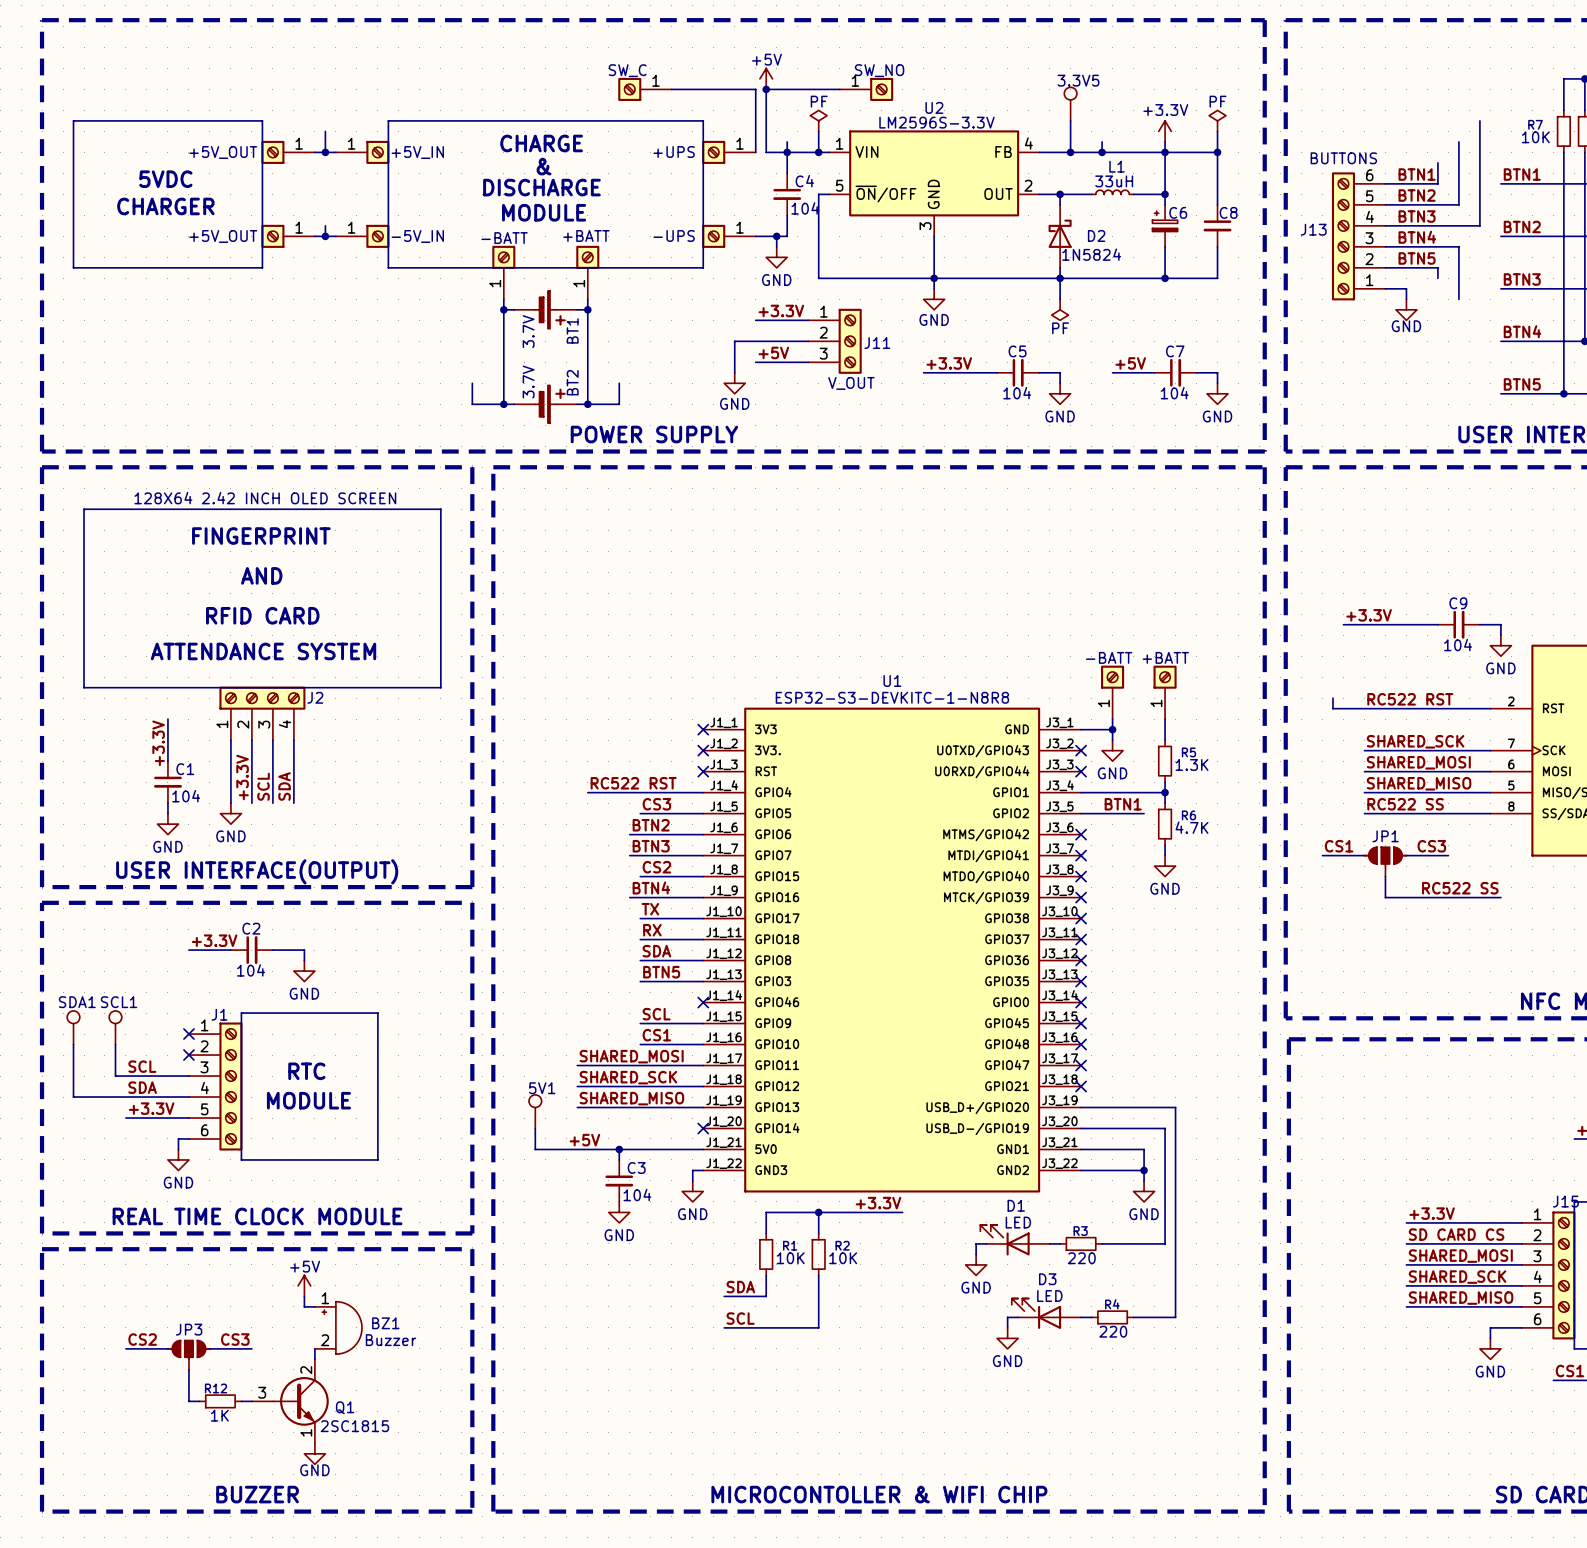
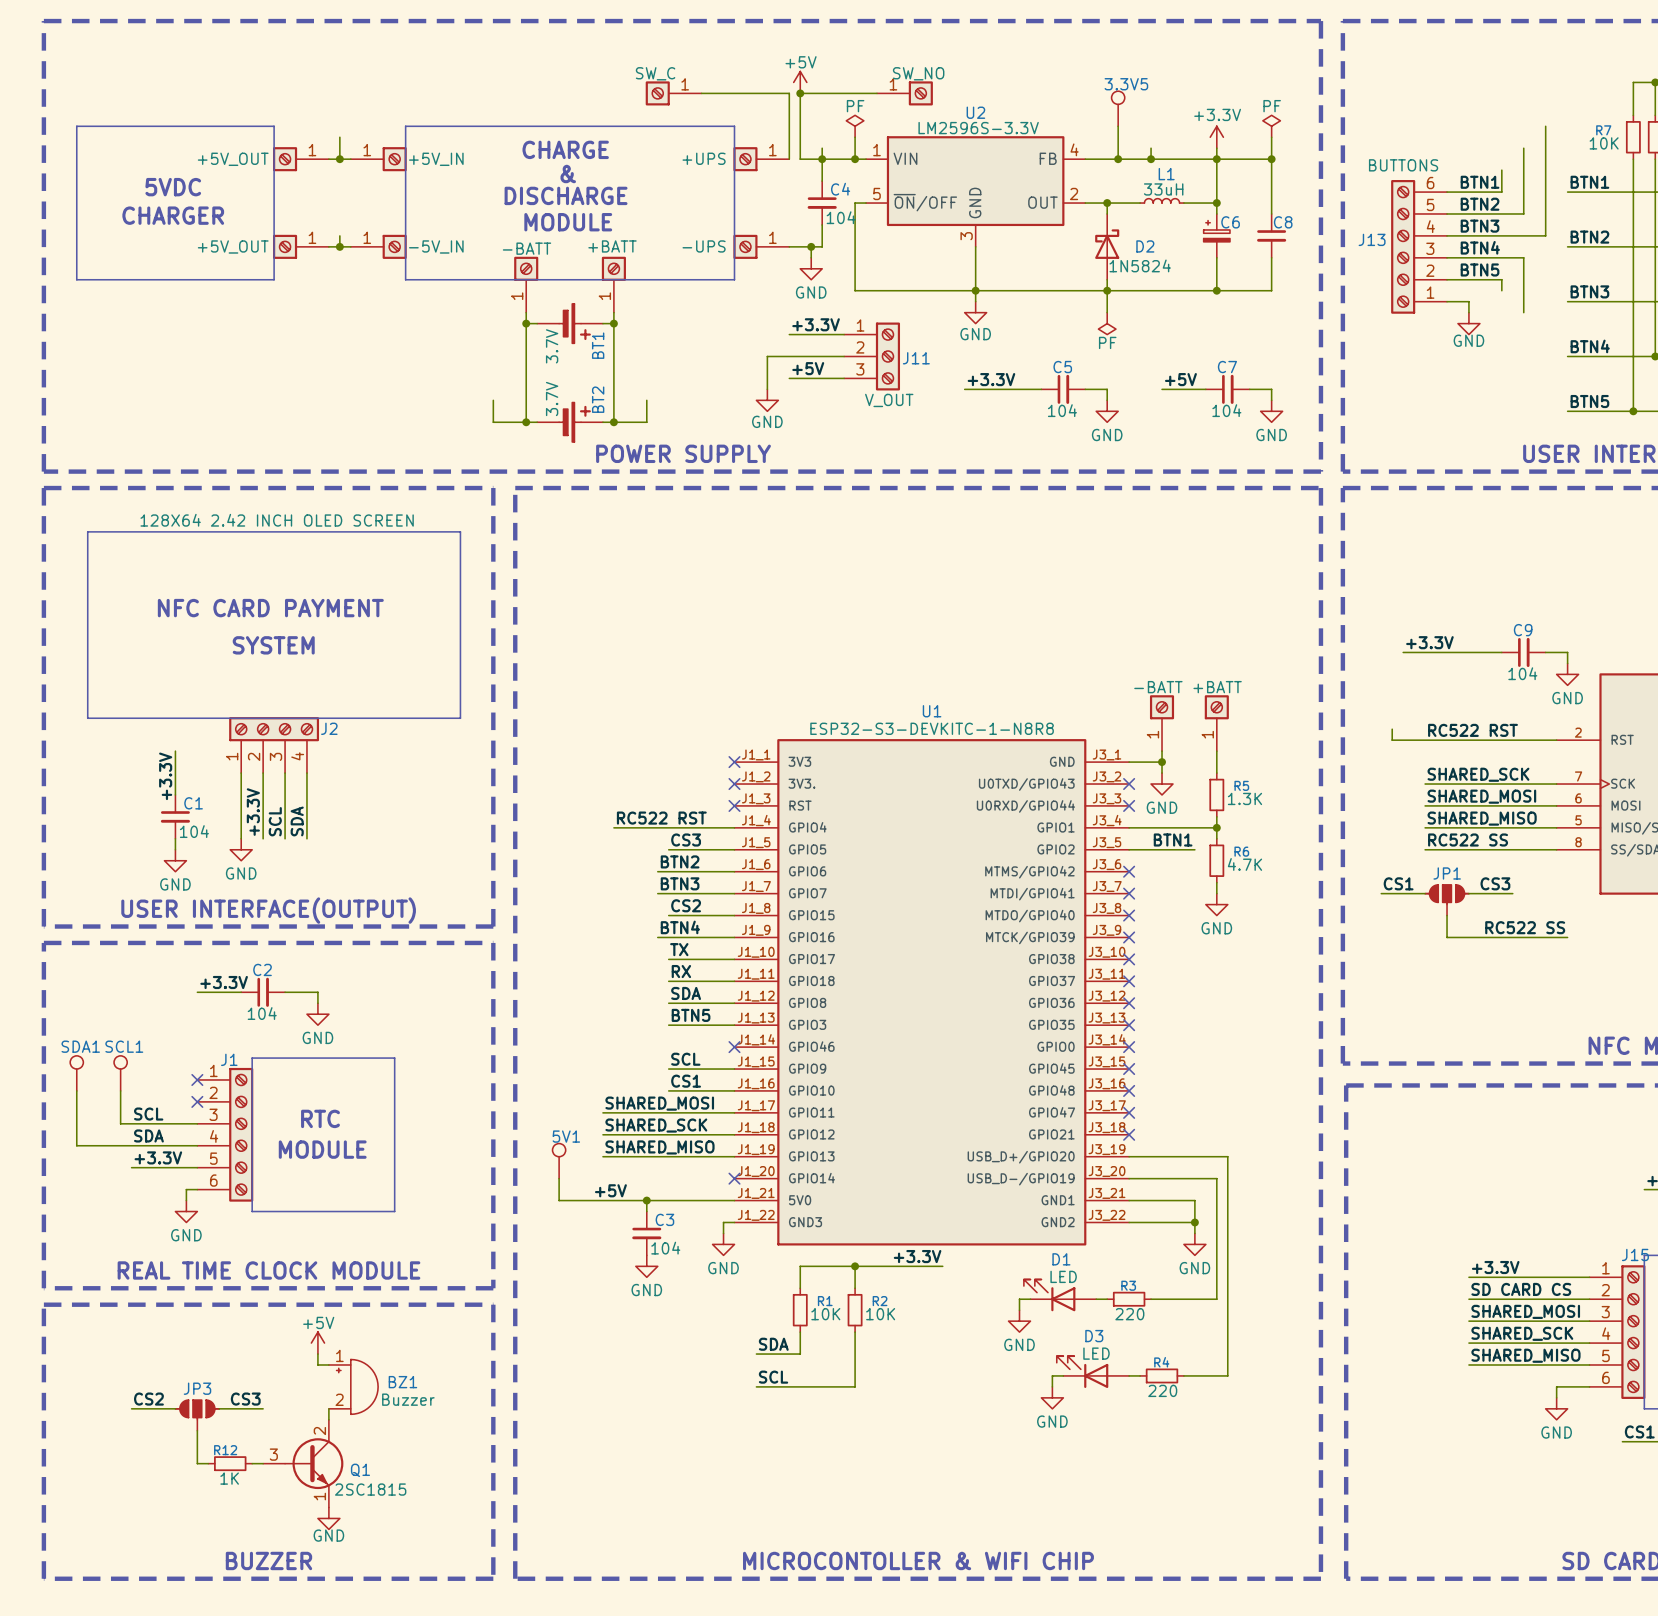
text: FINGERPRINT (261, 536) -> none
text: AND (261, 575) -> NFC CARD PAYMENT (270, 608)
text: RFID CARD (262, 615) -> SYSTEM (273, 645)
text: ATTENDANCE SYSTEM (263, 651) -> none

